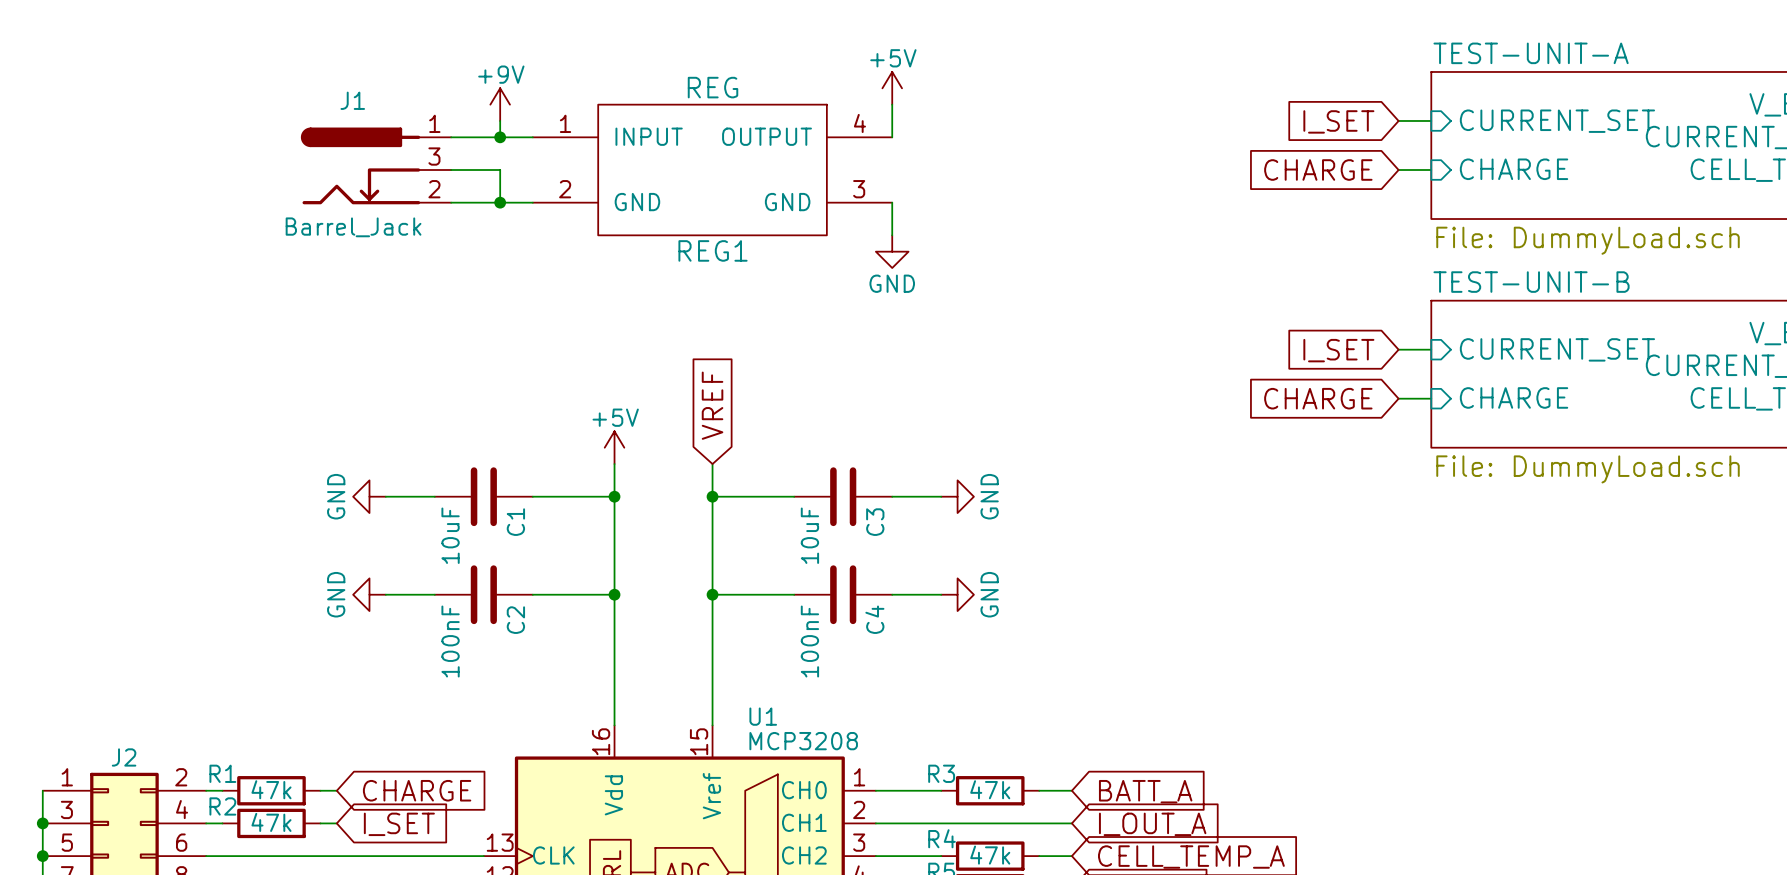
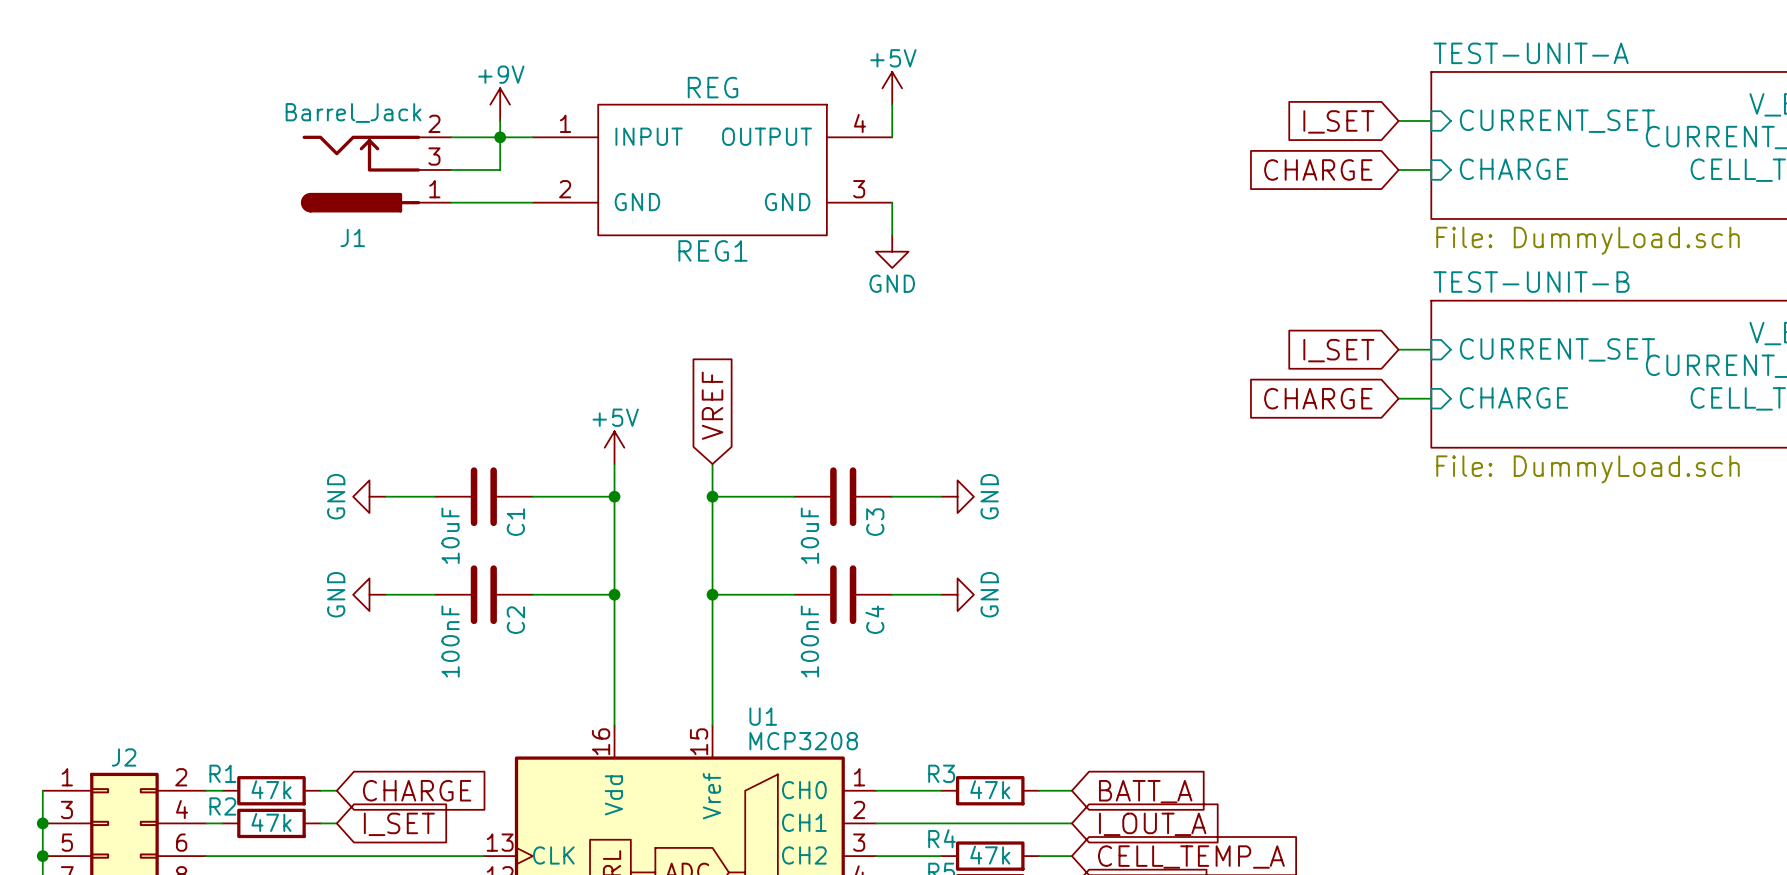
J1 flip: as is (360, 165) -> up-down (360, 174)
wire: (500, 170) (500, 202) -> (500, 170) (500, 137)
junction: (500, 202) -> none

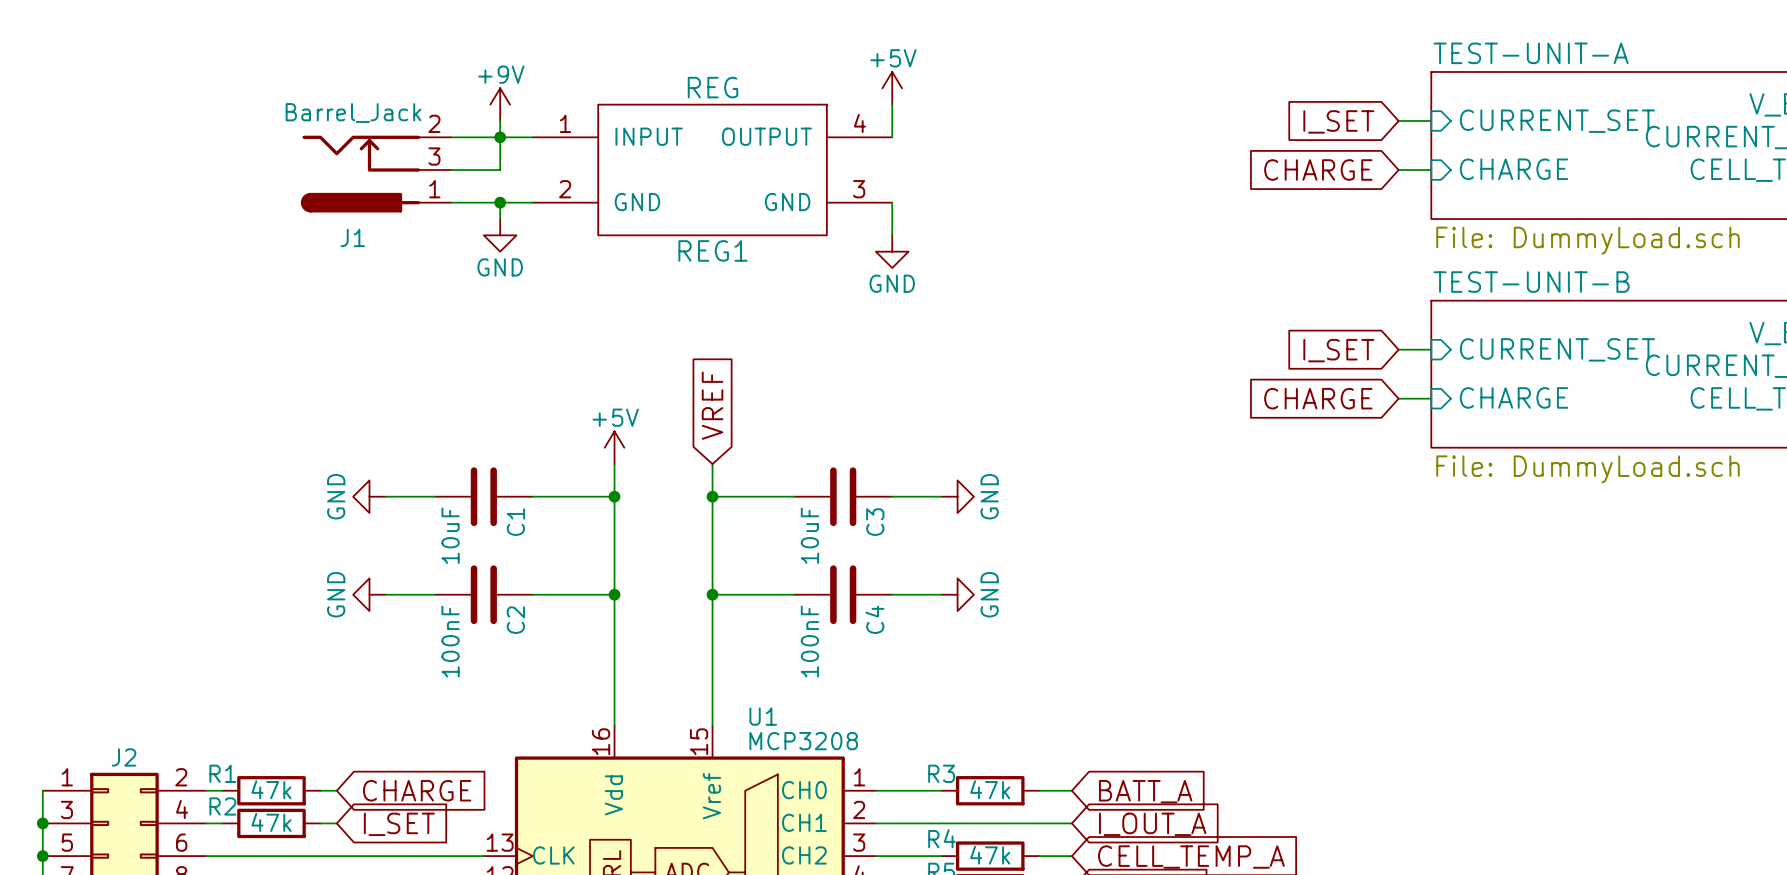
wire: none -> (500, 202) (500, 219)
junction: none -> (500, 202)
power symbol: none -> GND (500, 235)

